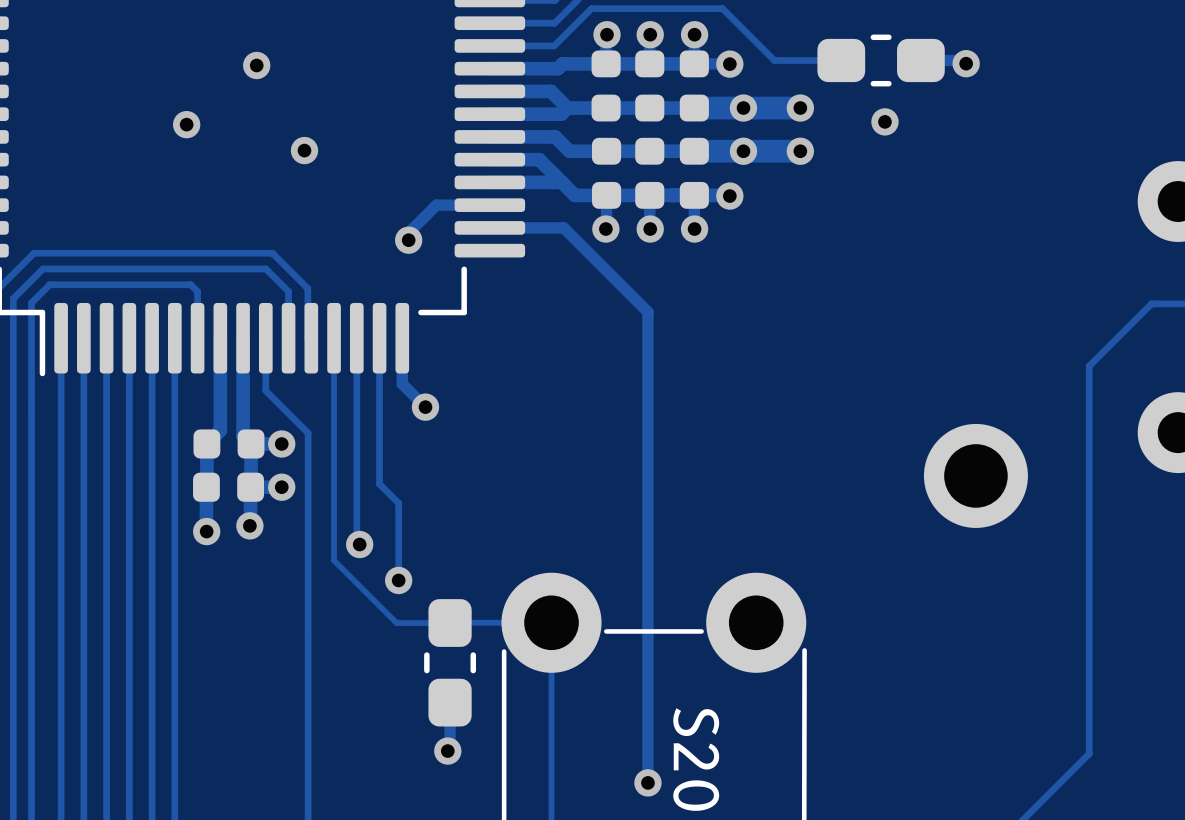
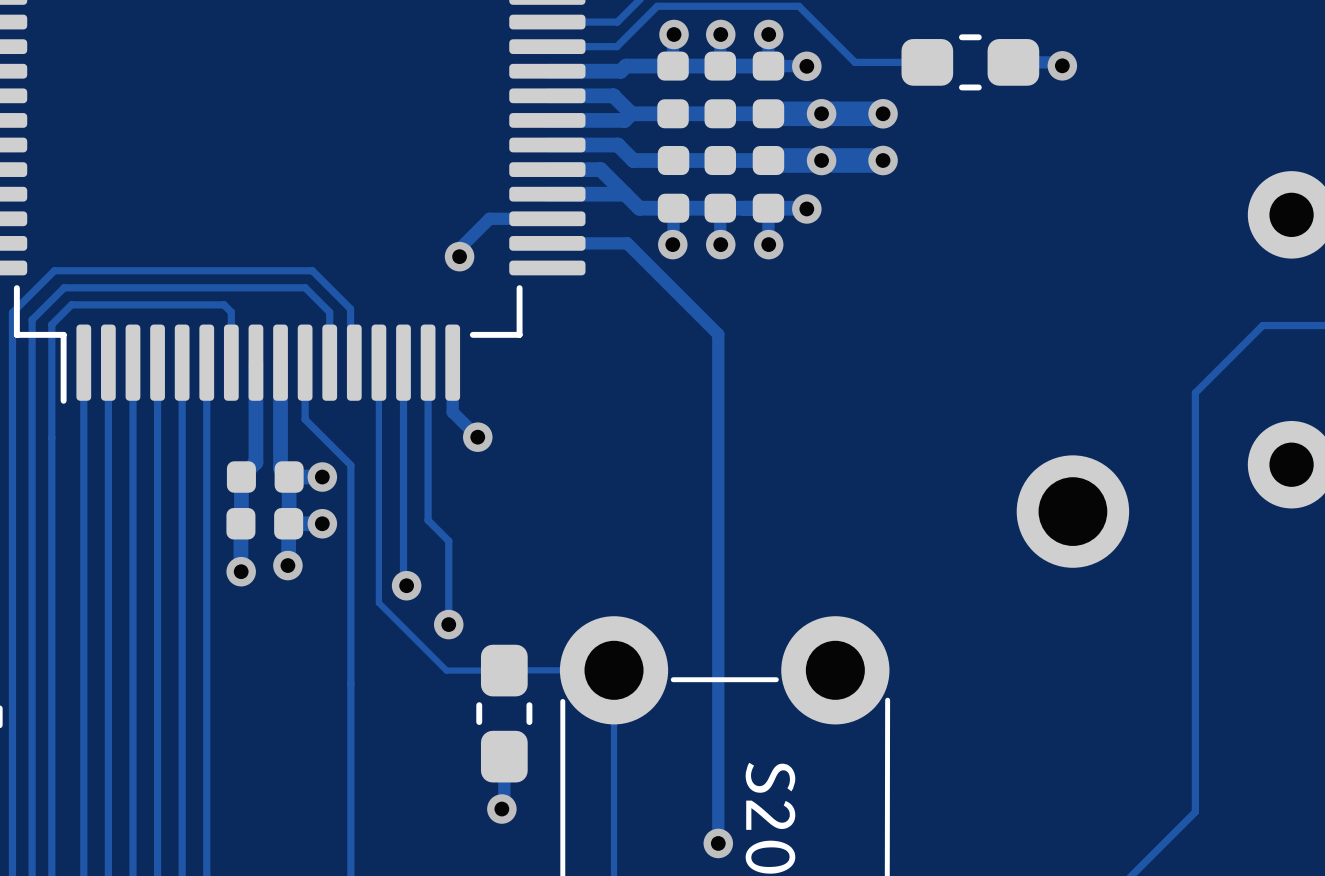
via: (256, 65) -> none
via: (884, 121) -> none
via: (186, 124) -> none
via: (304, 150) -> none

